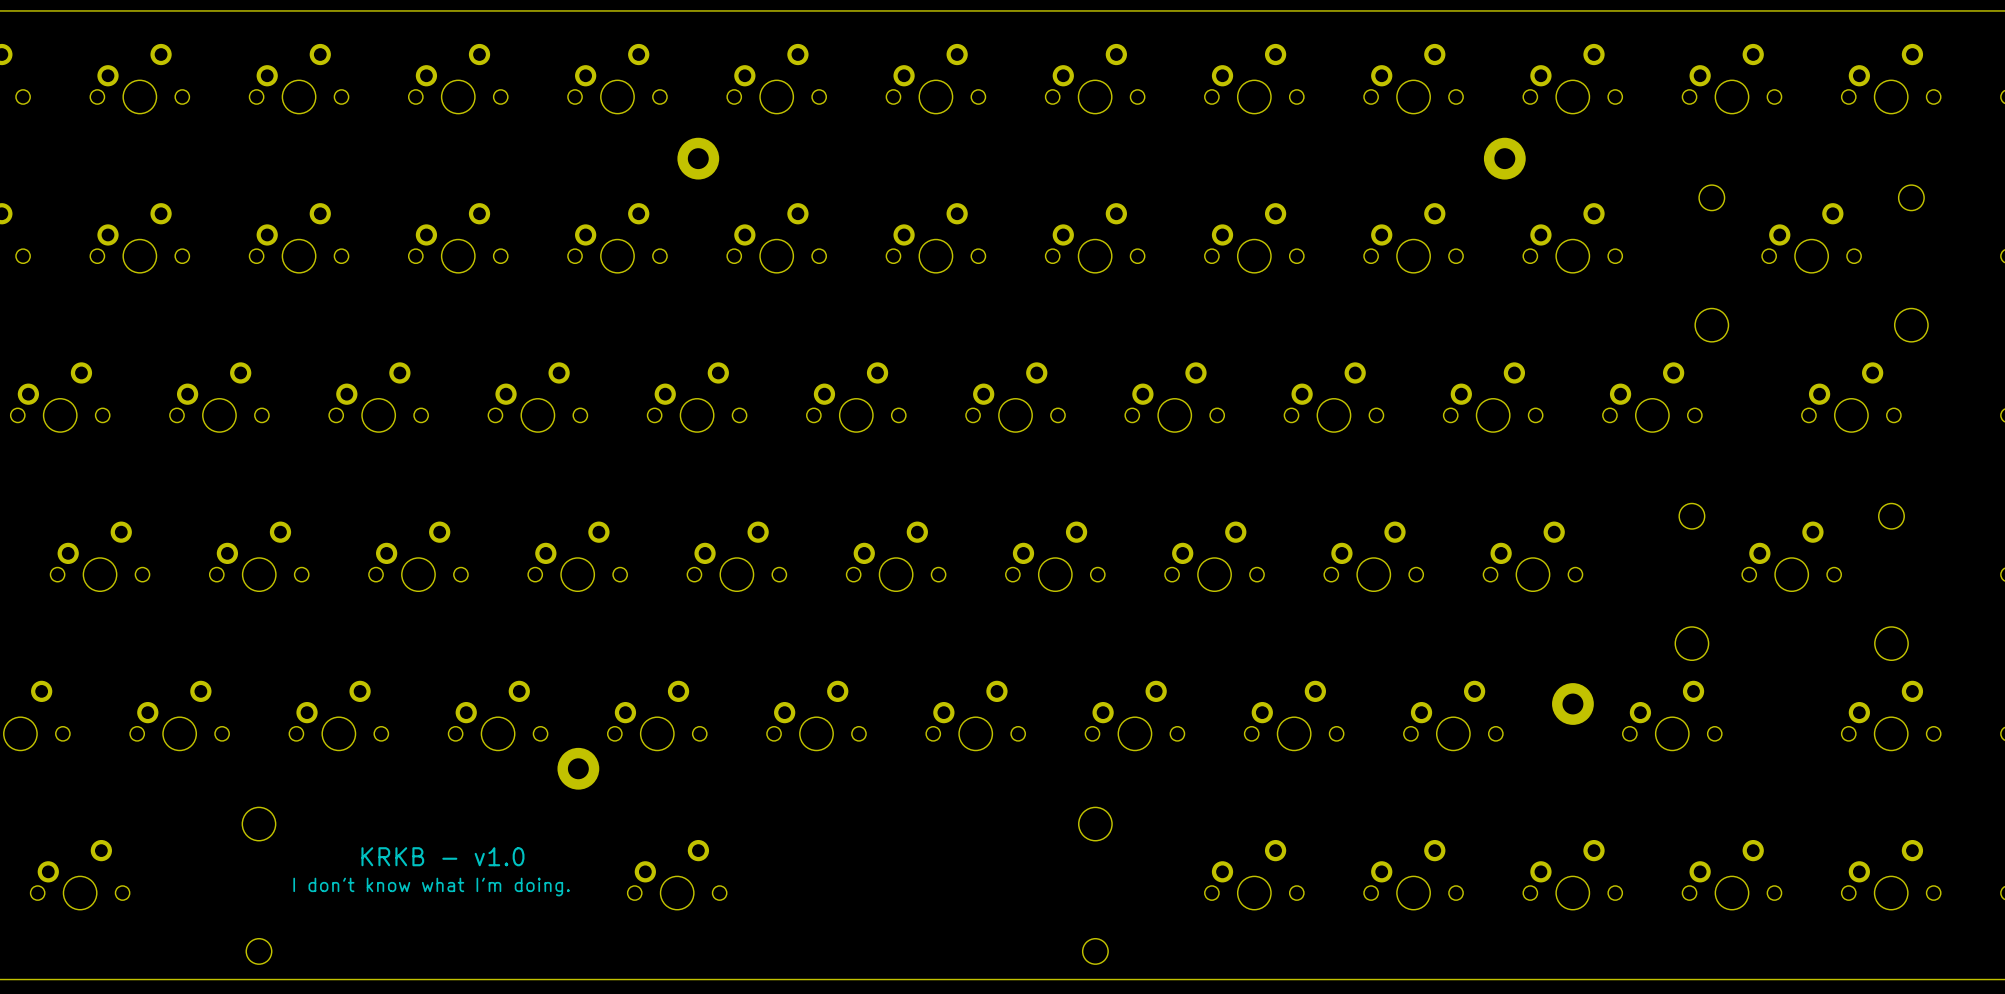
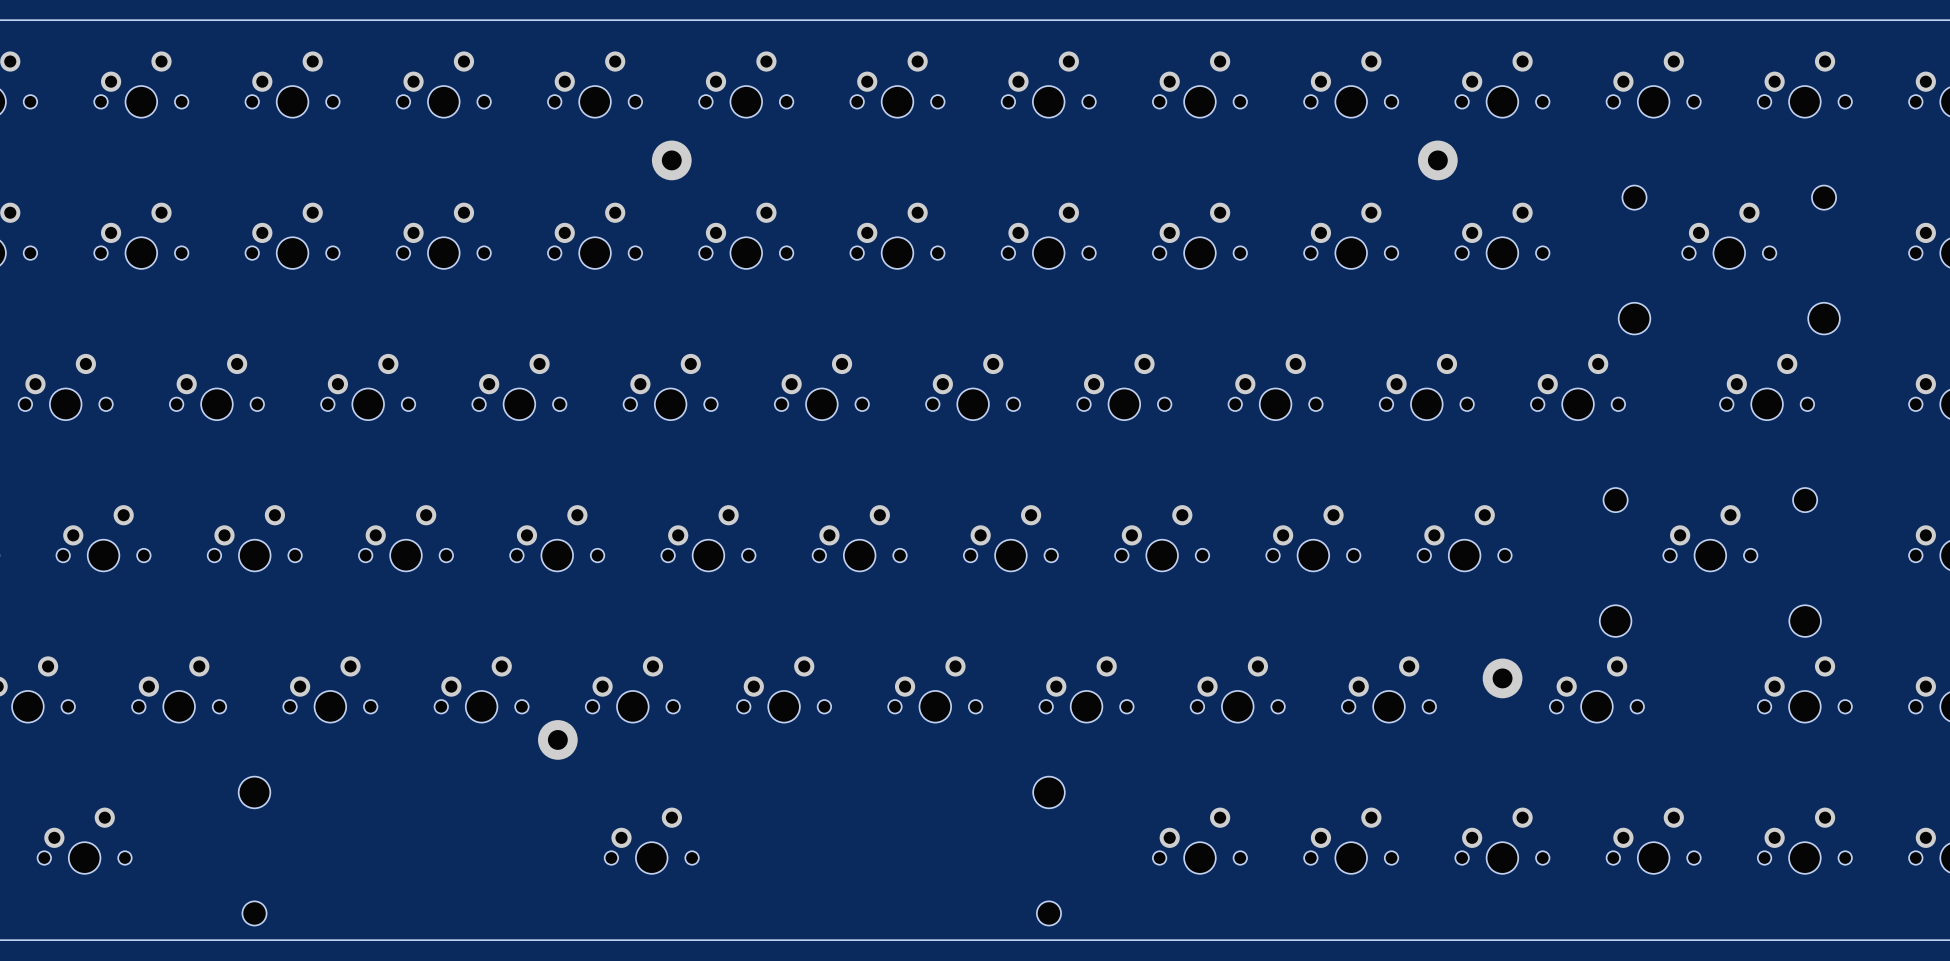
text: KRKB - v1.0 (442, 856) -> none
text: I don't know what I'm doing. (431, 887) -> none

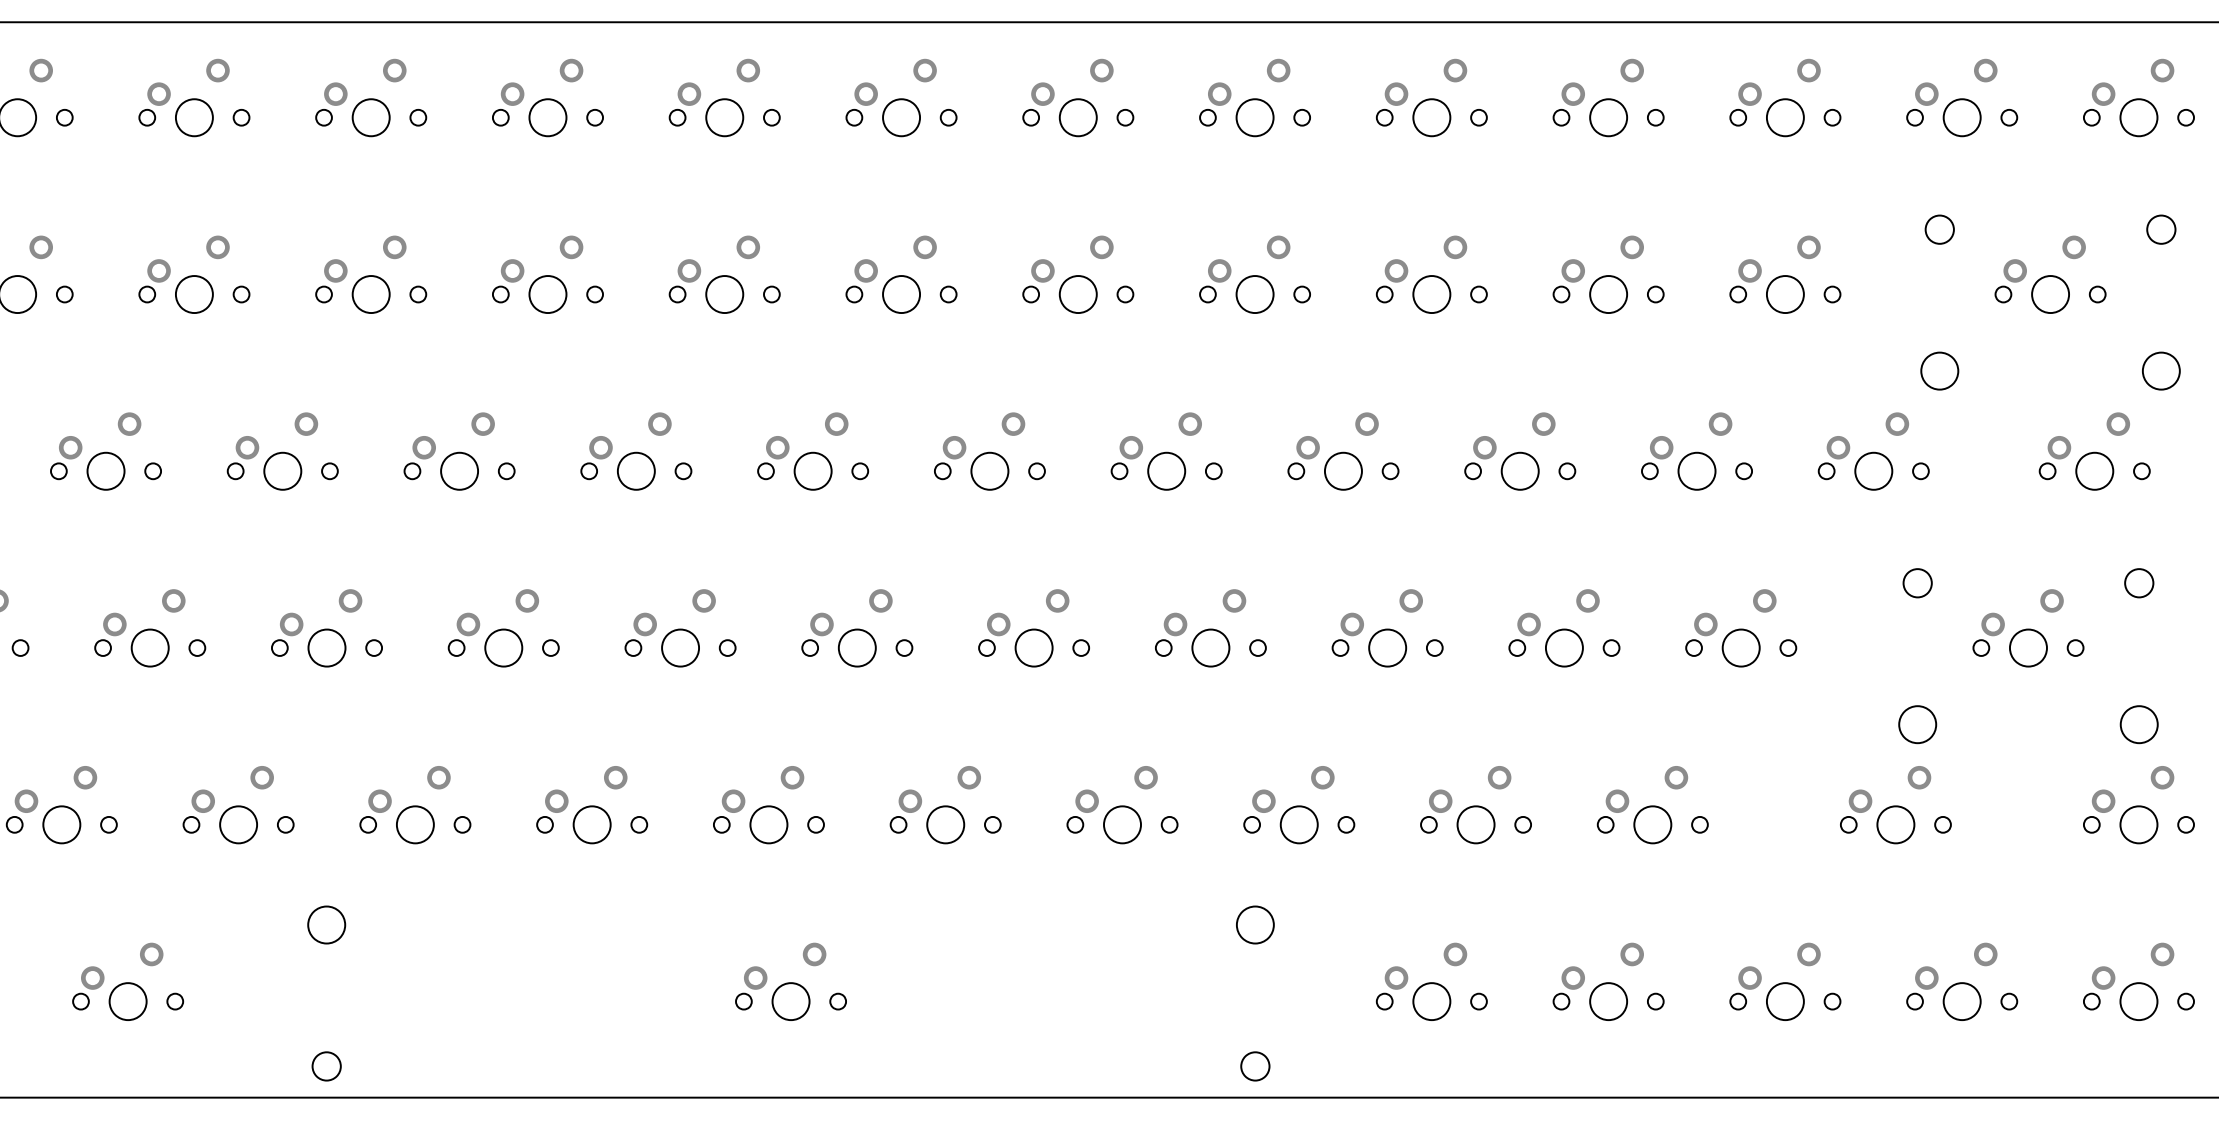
part: (671, 160) -> none
part: (1437, 160) -> none
part: (1502, 678) -> none
part: (557, 739) -> none

